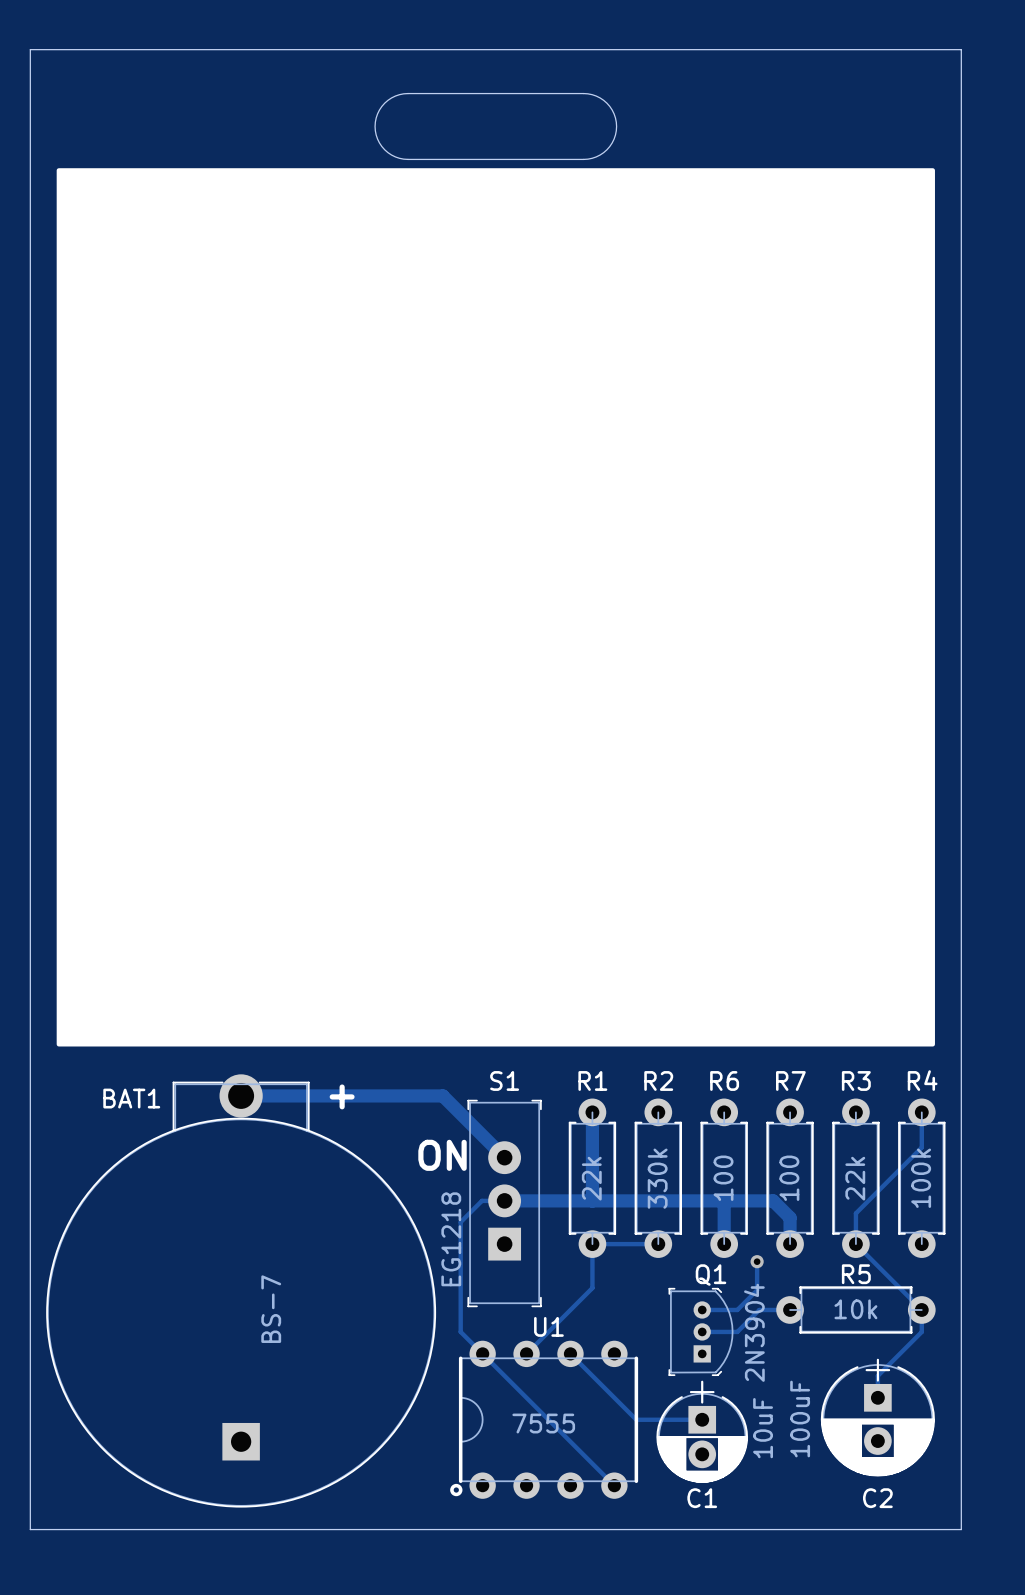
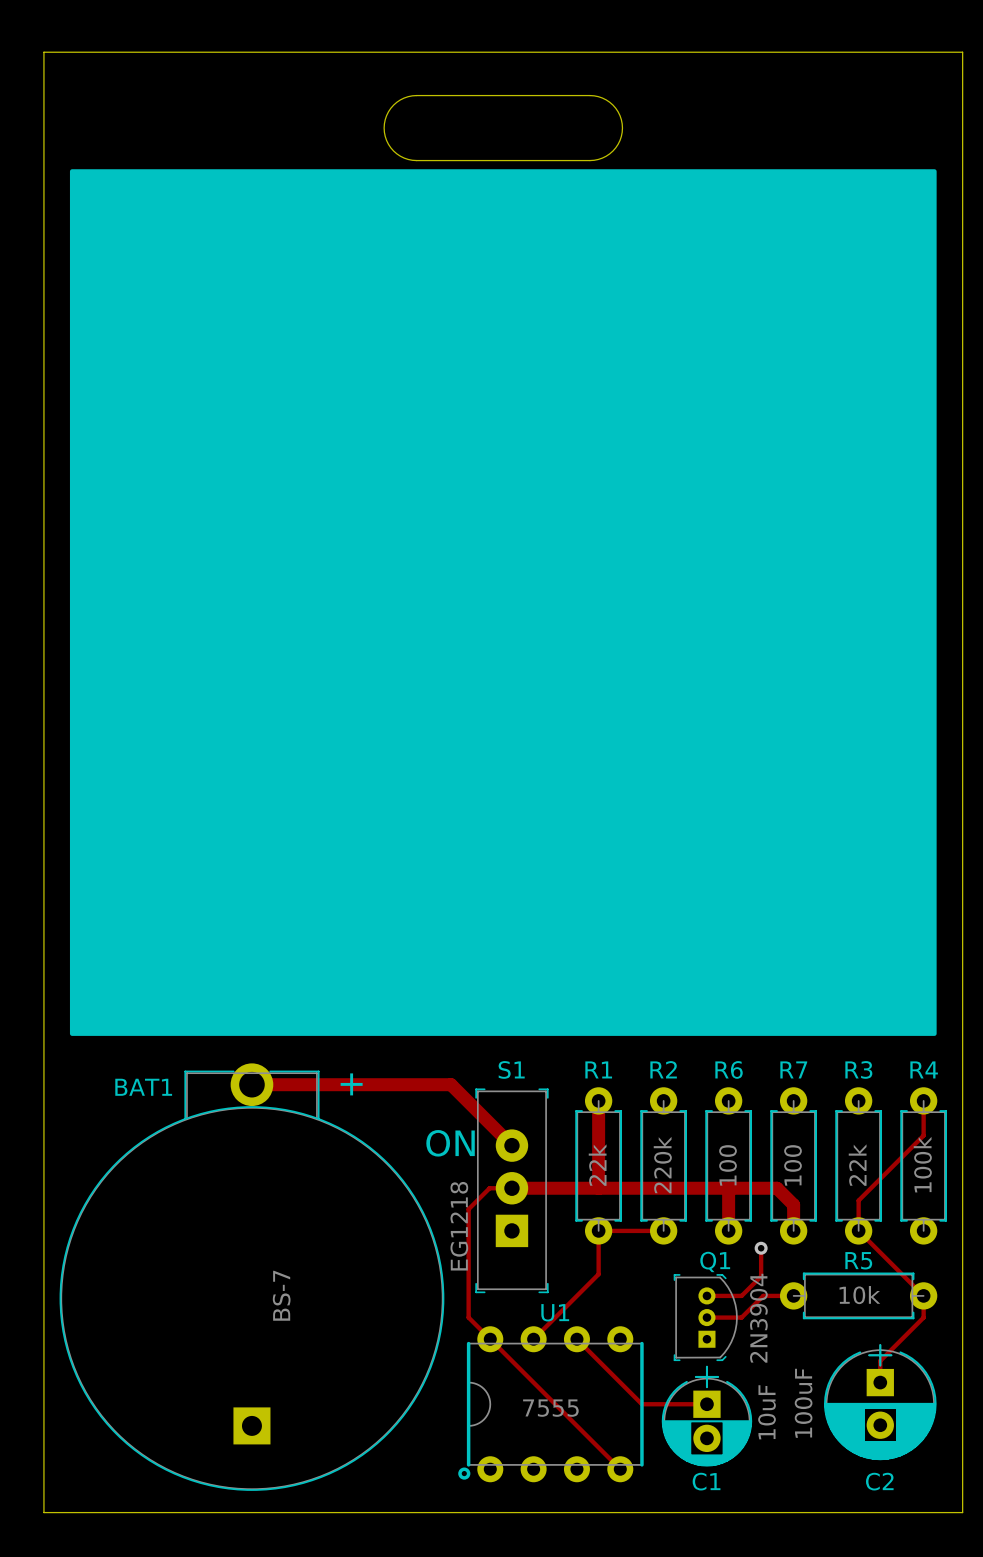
R2 value: 330k (657, 1178) -> 220k (662, 1165)

